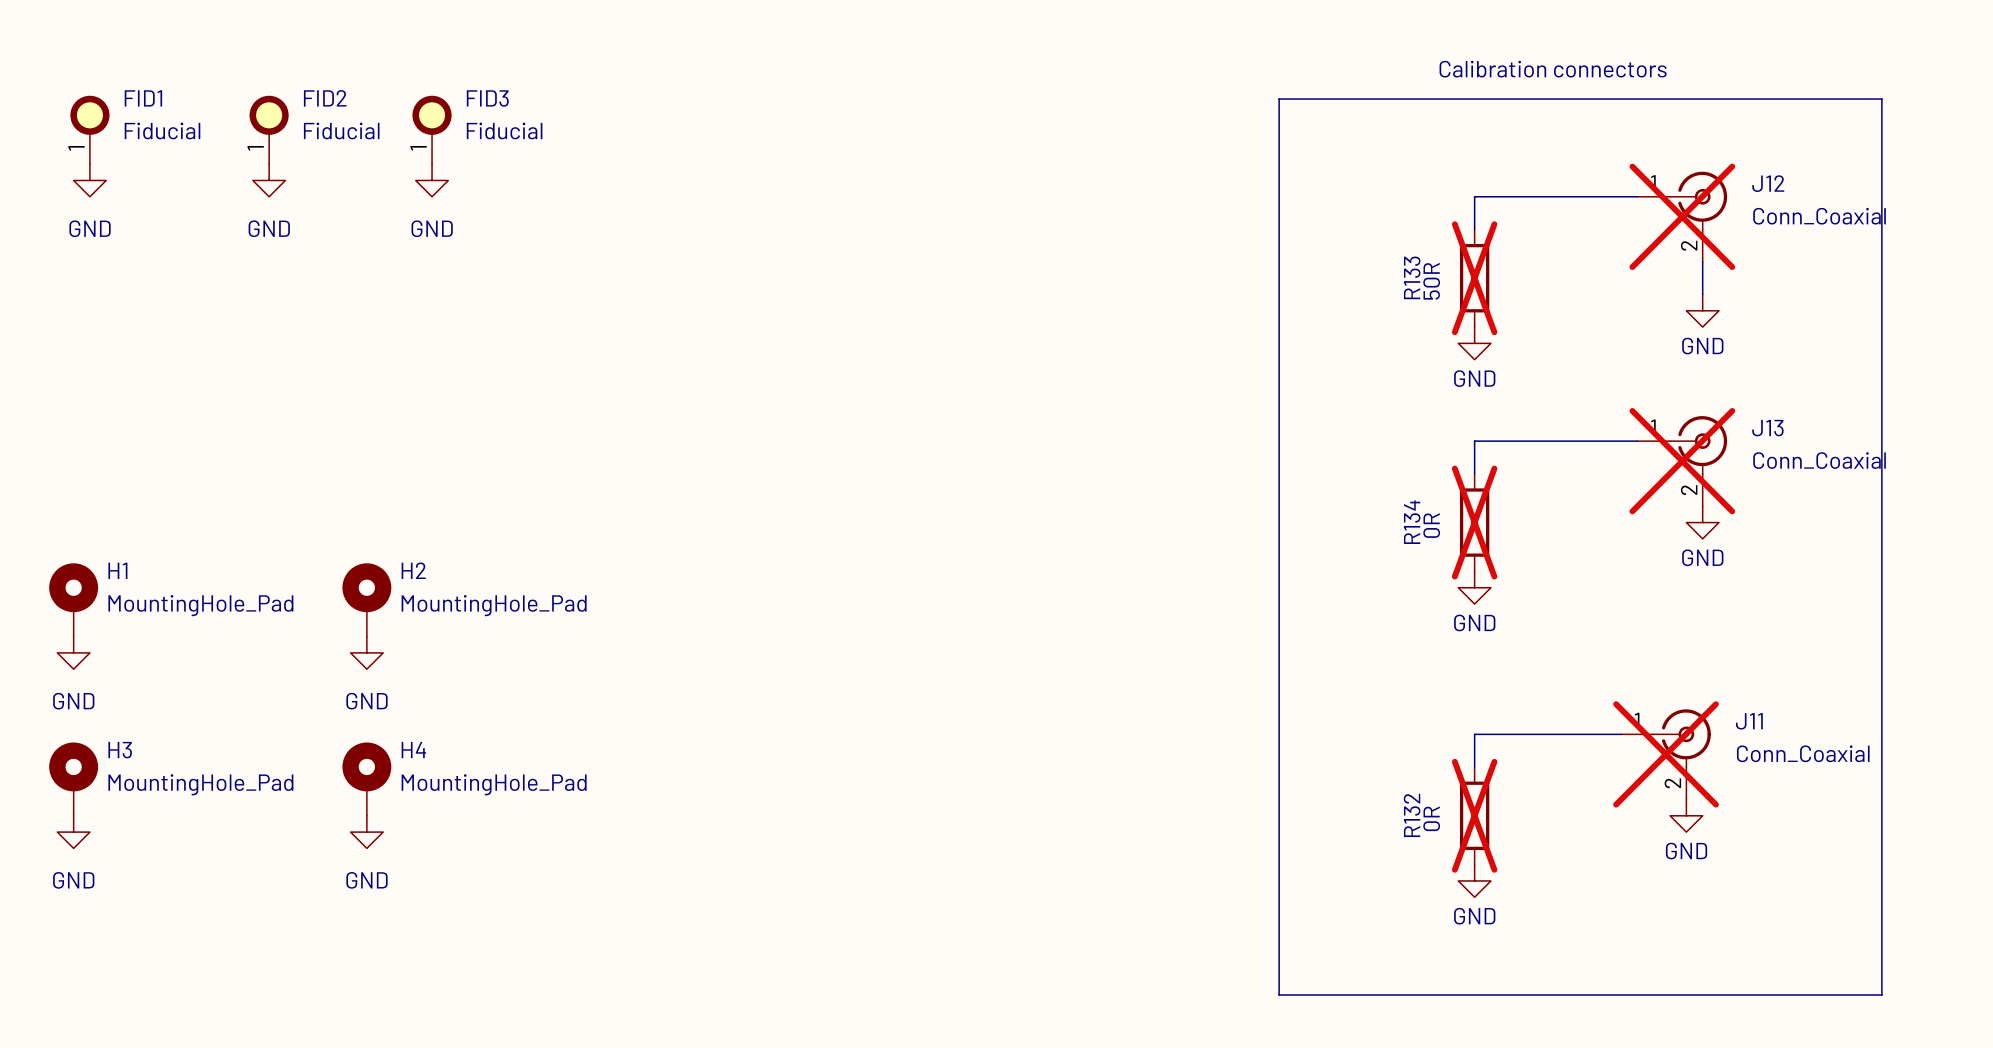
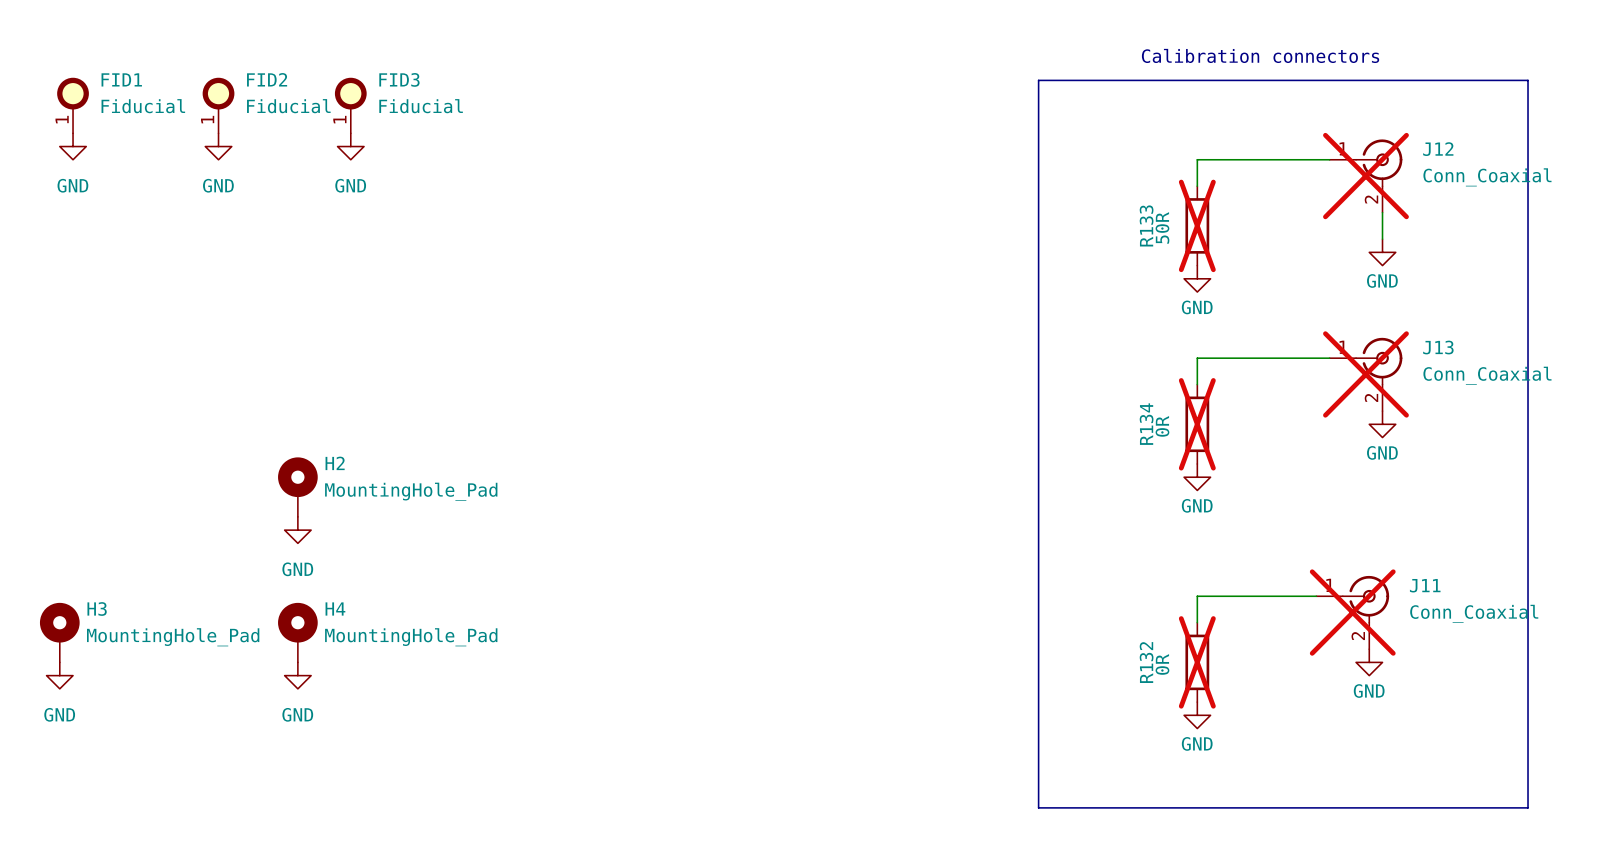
H1: MountingHole_Pad (73, 599) -> none
power symbol: GND (73, 652) -> none

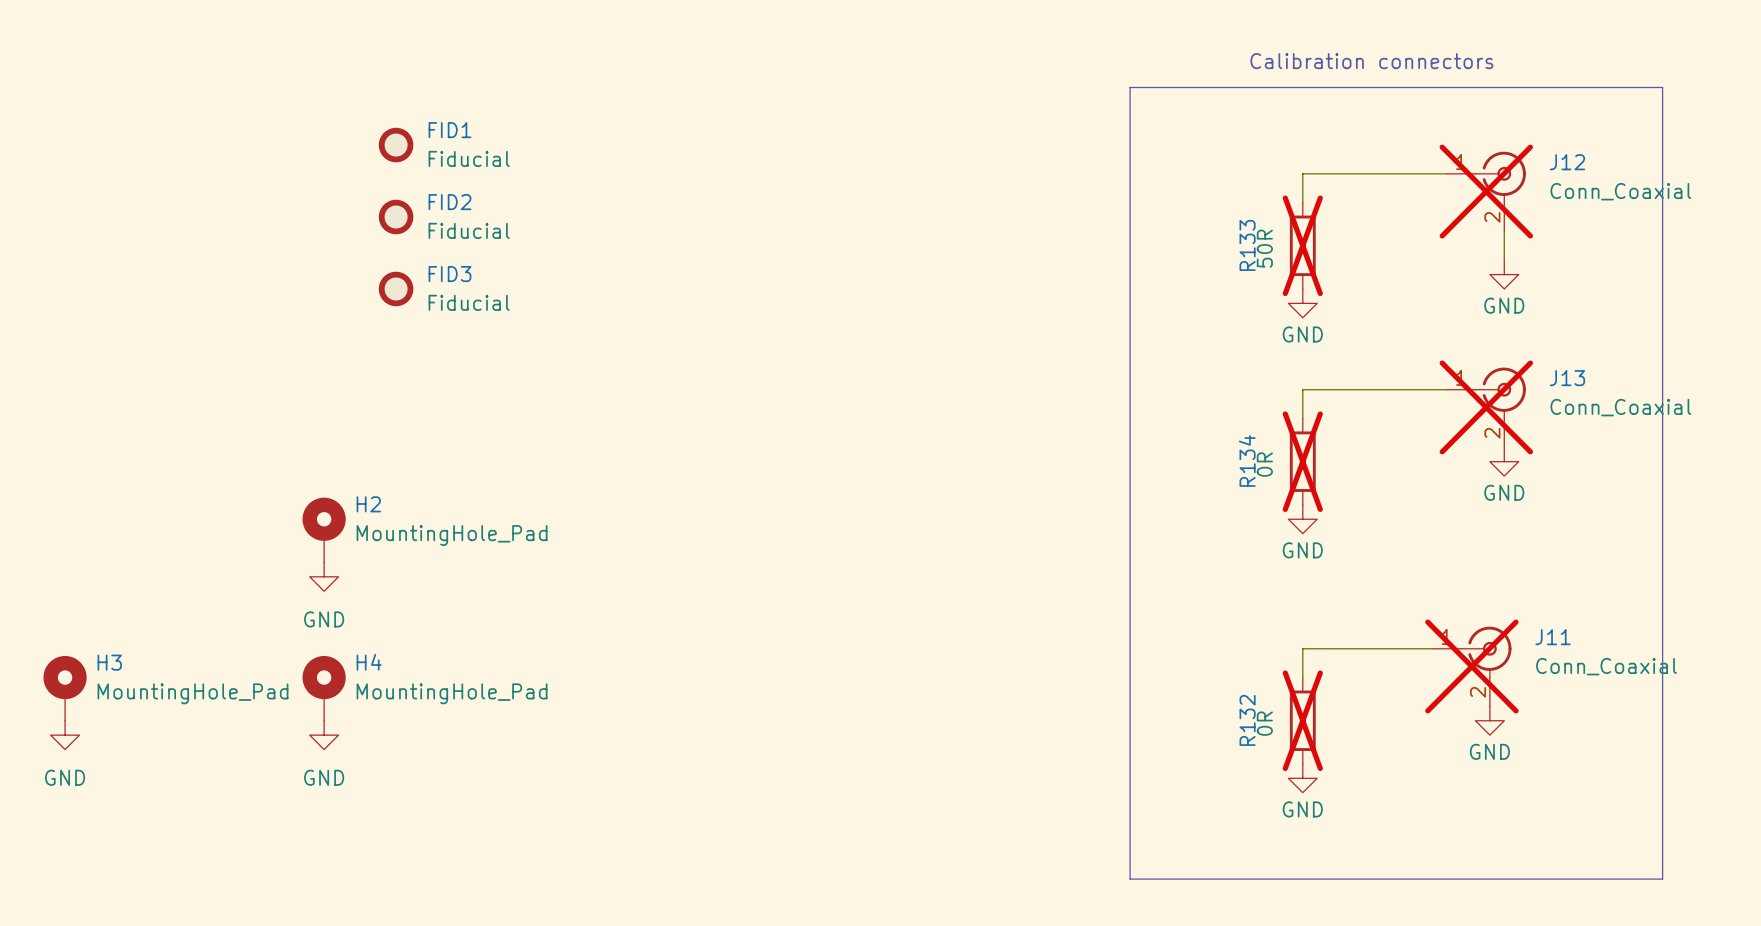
FID1 symbol: [57, 77, 89, 134] -> [378, 127, 414, 163]
FID2 symbol: [202, 77, 235, 134] -> [378, 199, 414, 235]
FID3 symbol: [334, 77, 367, 134] -> [378, 271, 414, 307]
power symbol: GND (73, 146) -> none
power symbol: GND (218, 146) -> none
power symbol: GND (350, 146) -> none

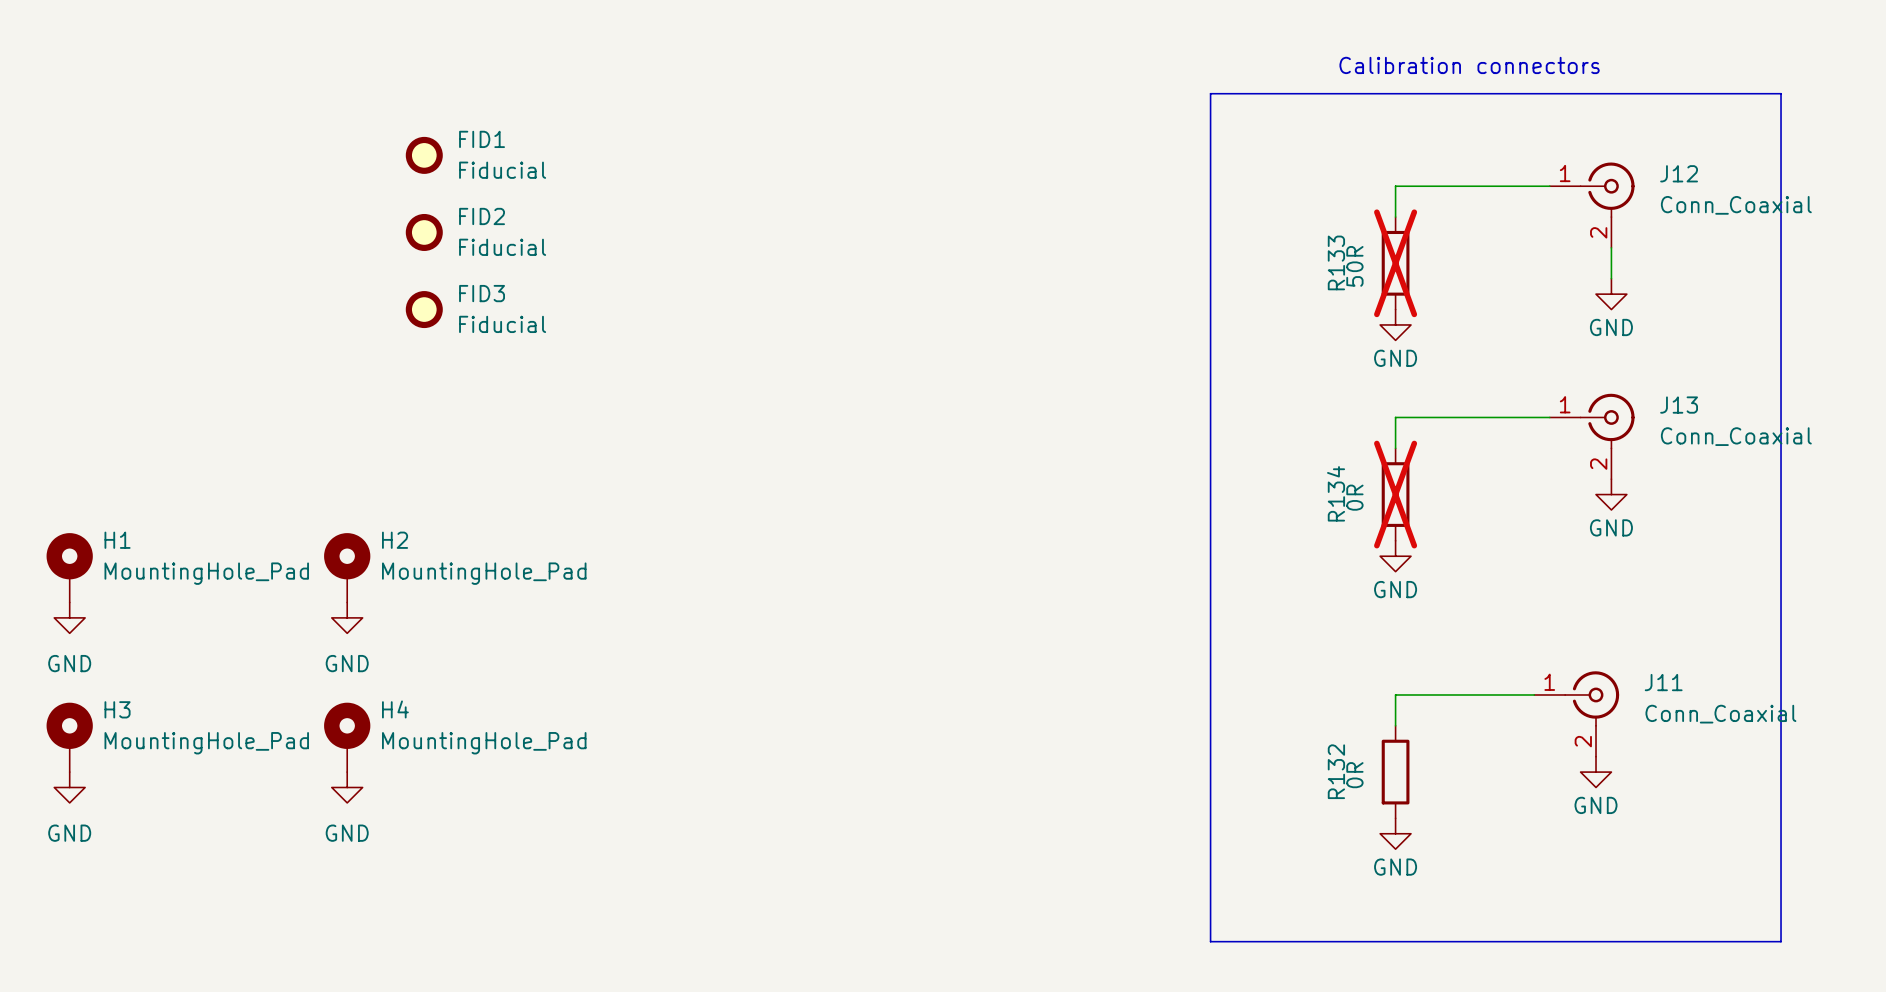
J12 do-not-place cross: (1486, 191) -> none
J13 do-not-place cross: (1486, 407) -> none
H1: none -> MountingHole_Pad (69, 567)
power symbol: none -> GND (69, 617)
J11 do-not-place cross: (1471, 666) -> none
R132 do-not-place cross: (1302, 720) -> none

